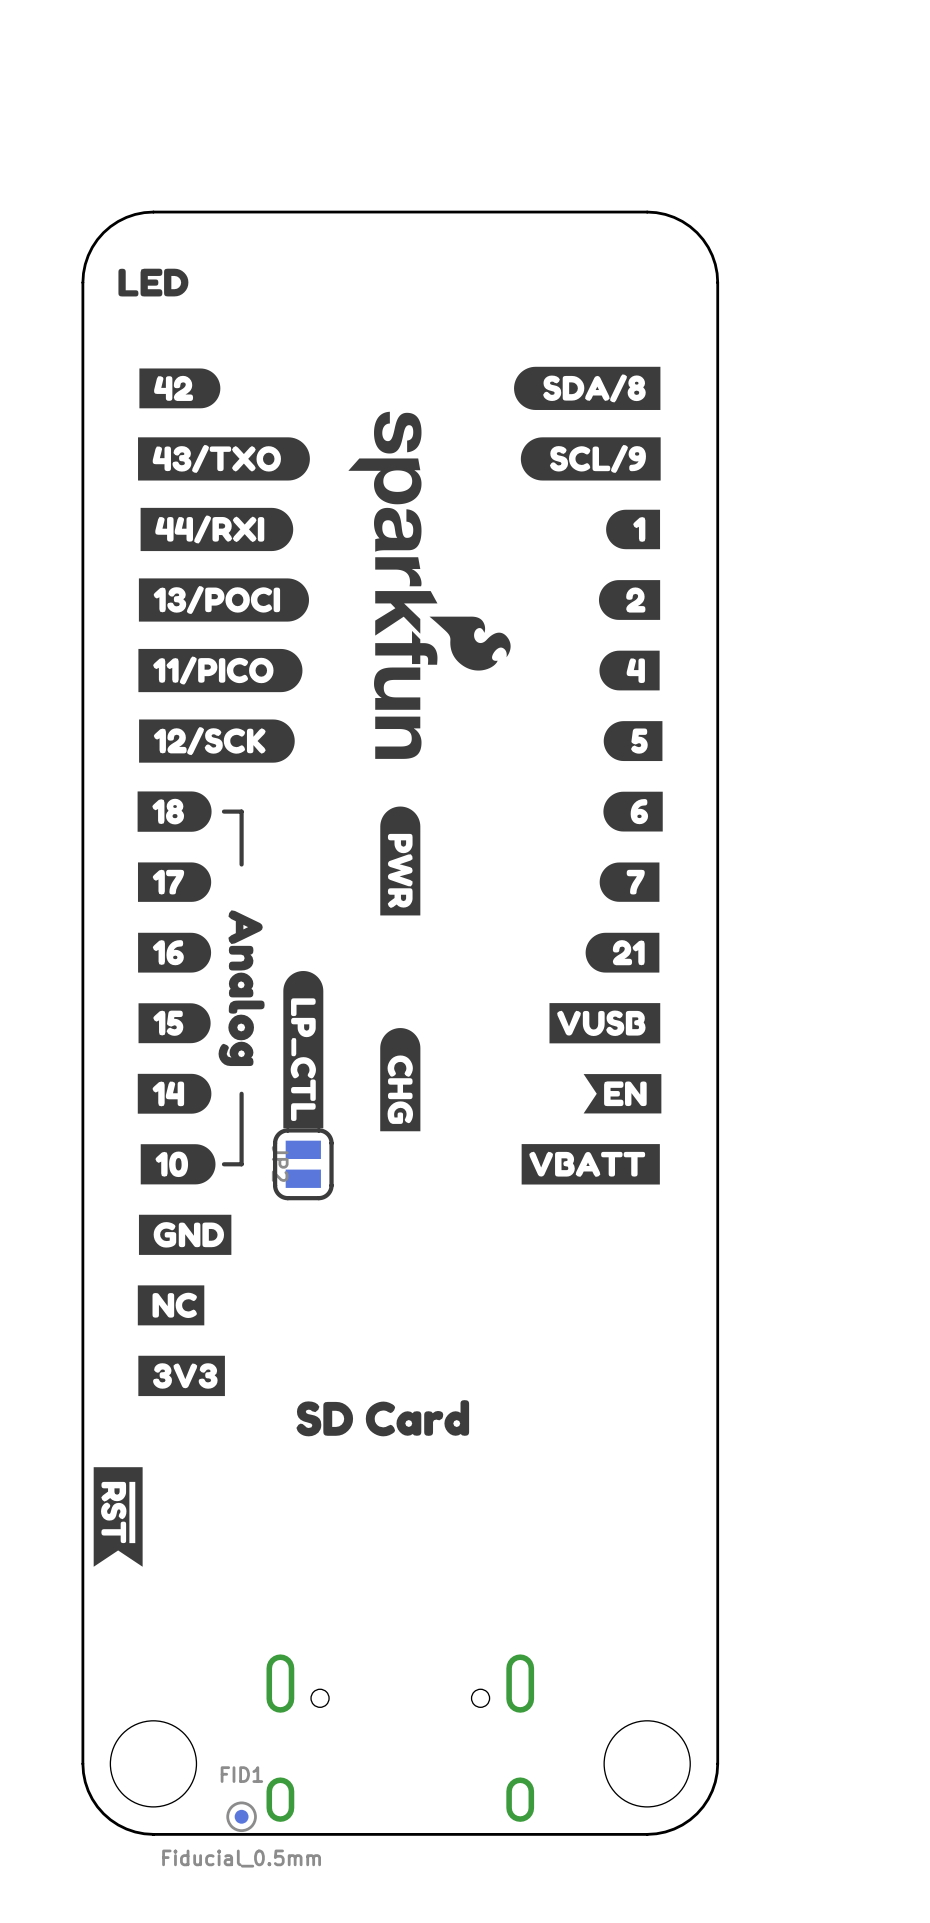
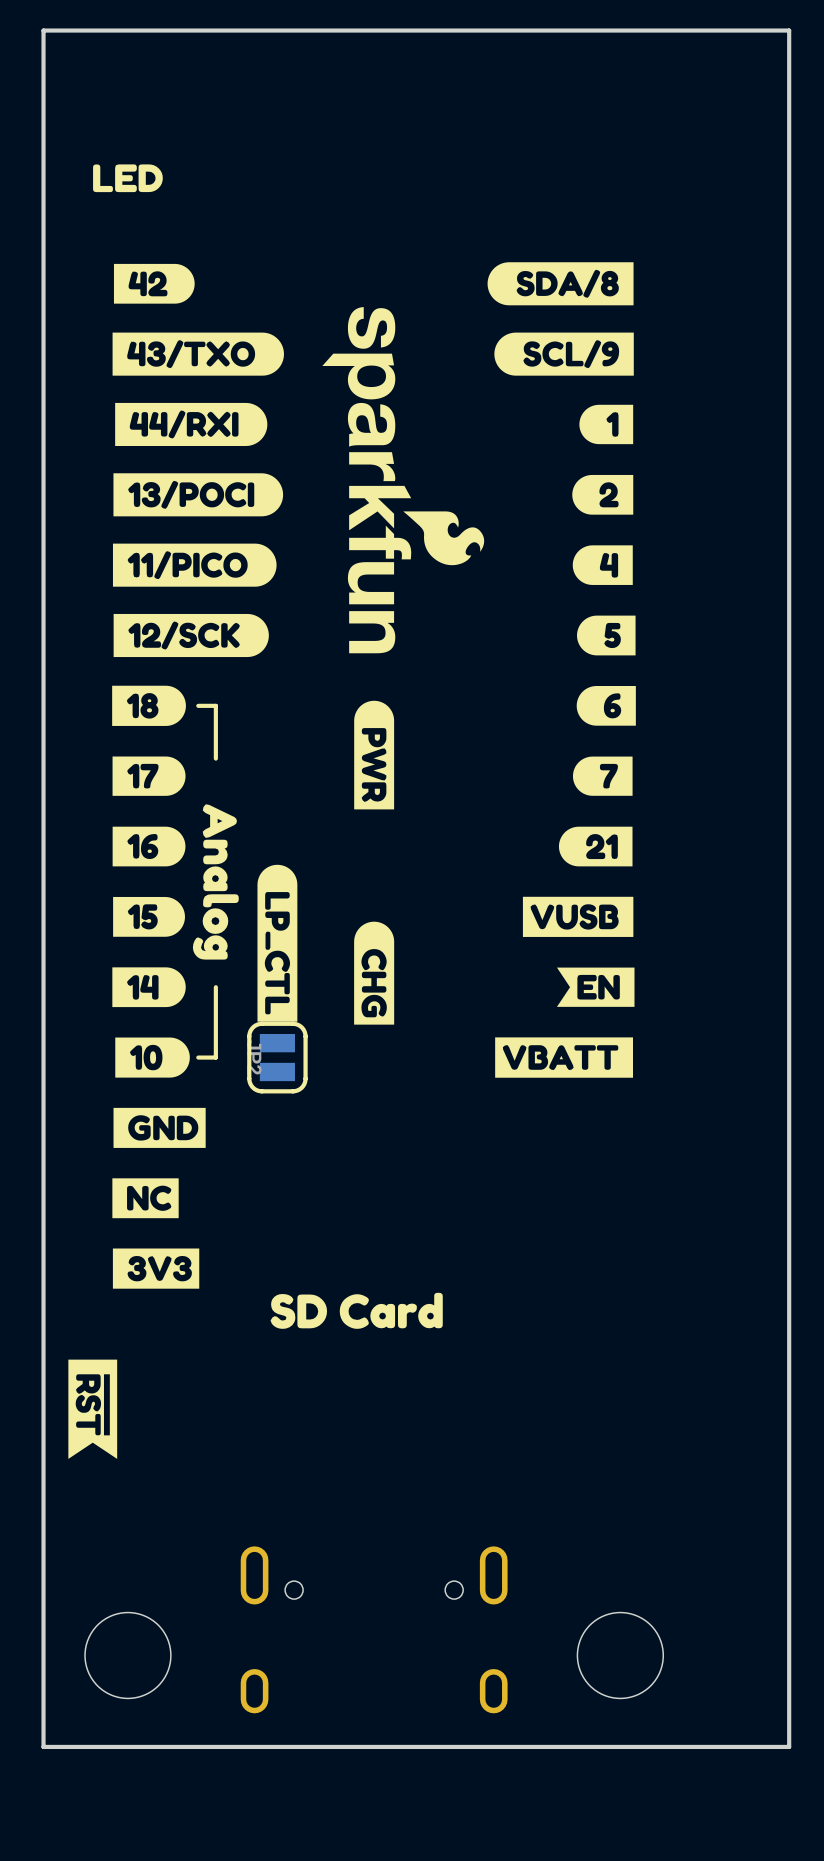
board edge: (647, 212) (144, 212) (118, 221) (103, 232) (92, 247) (85, 264) (82, 282) (82, 1763) (85, 1782) (97, 1806) (110, 1819) (135, 1831) (153, 1834) (656, 1833) (674, 1829) (697, 1813) (708, 1799) (715, 1782) (717, 1763) (717, 282) (712, 255) (697, 232) (674, 217) (647, 212) -> (789, 30) (789, 1746) (43, 1746) (43, 30) (789, 30)
FID1: Fiducial_0.5mm (241, 1816) -> none

